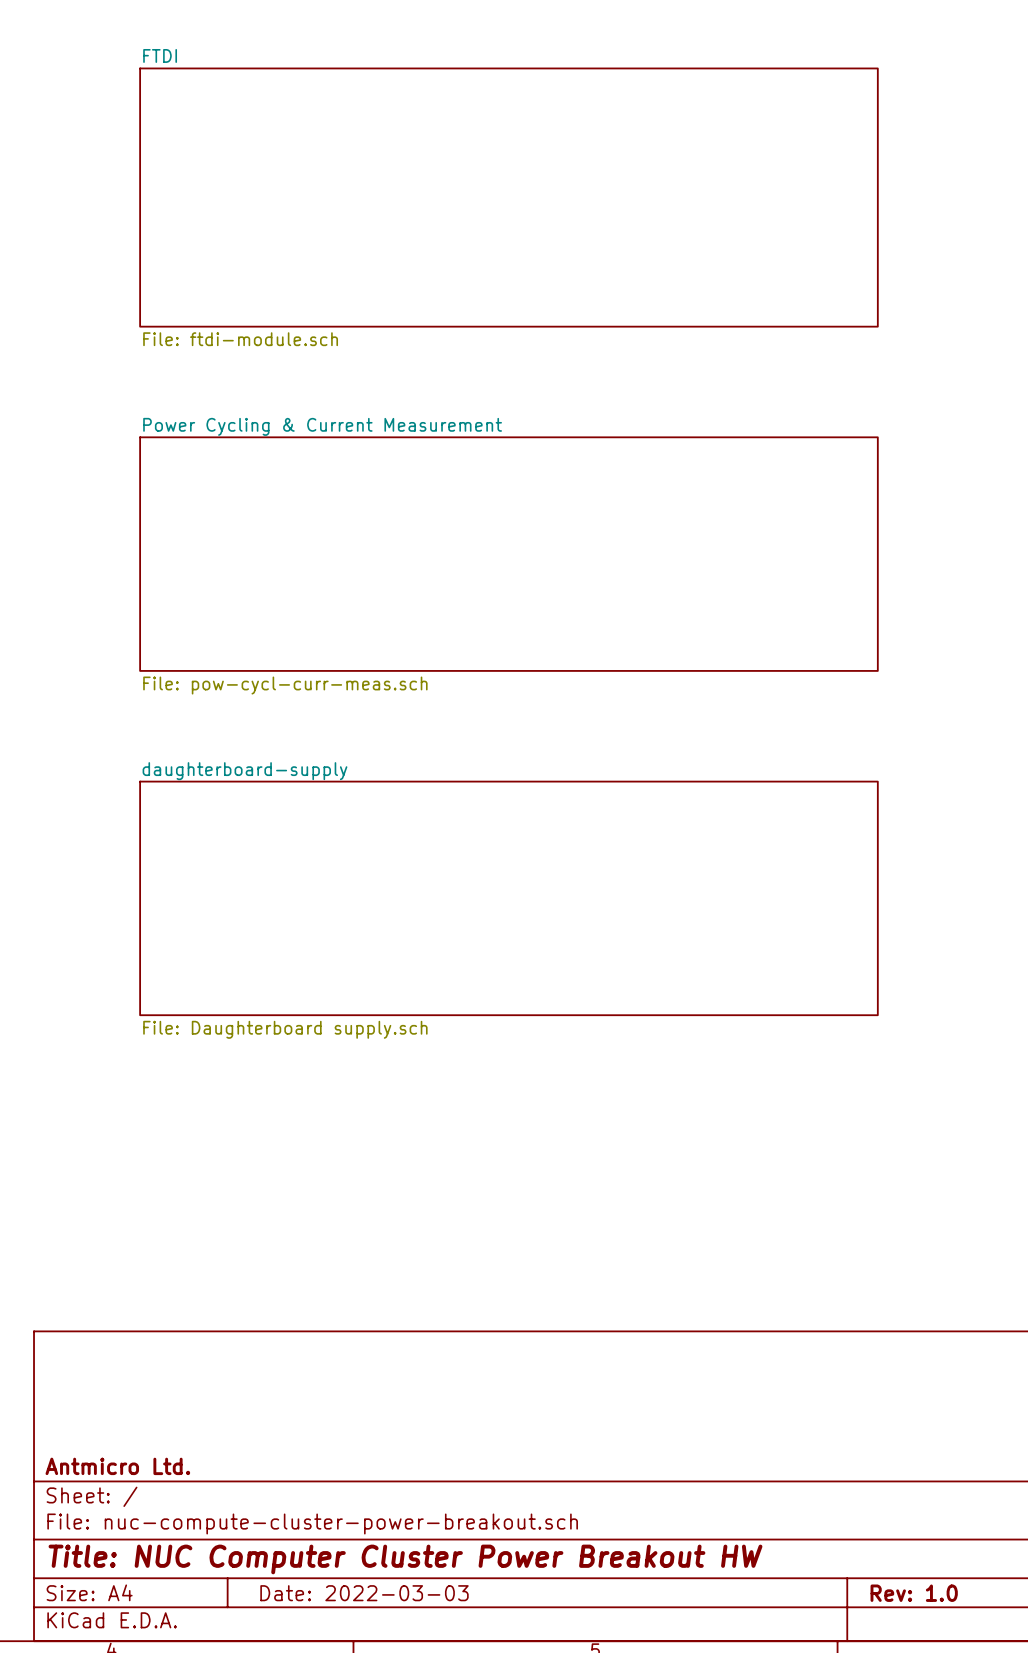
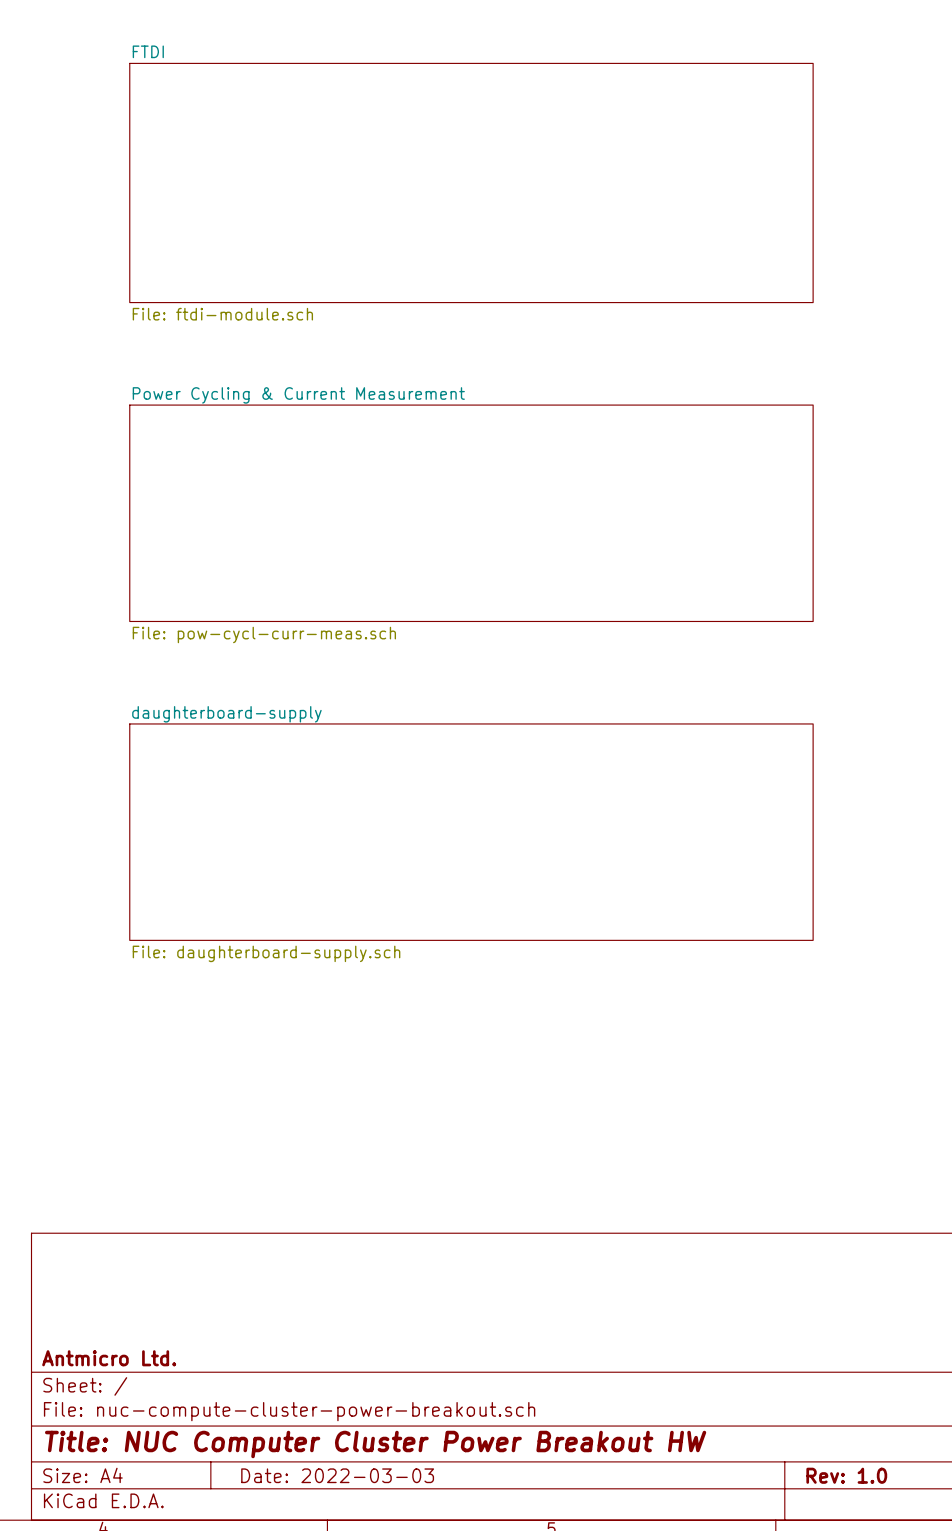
sheet daughterboard-supply value: File: Daughterboard supply.sch (285, 1029) -> File: daughterboard-supply.sch (266, 953)

